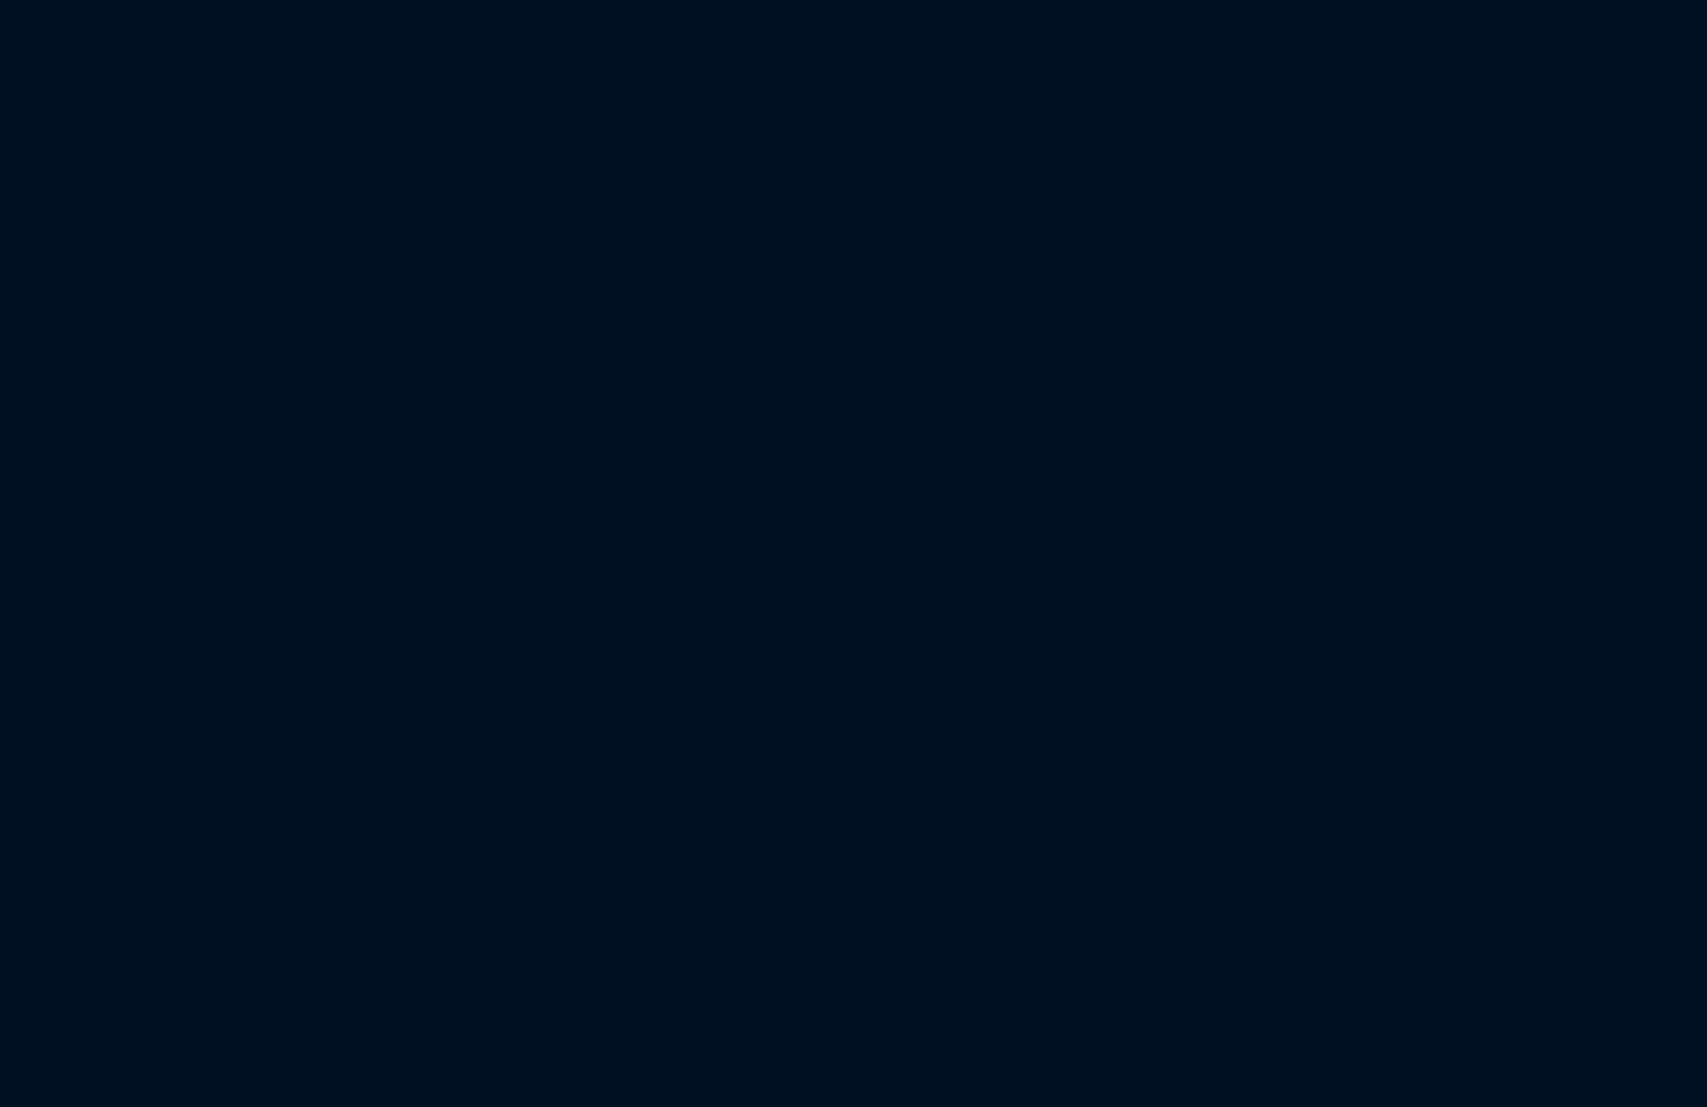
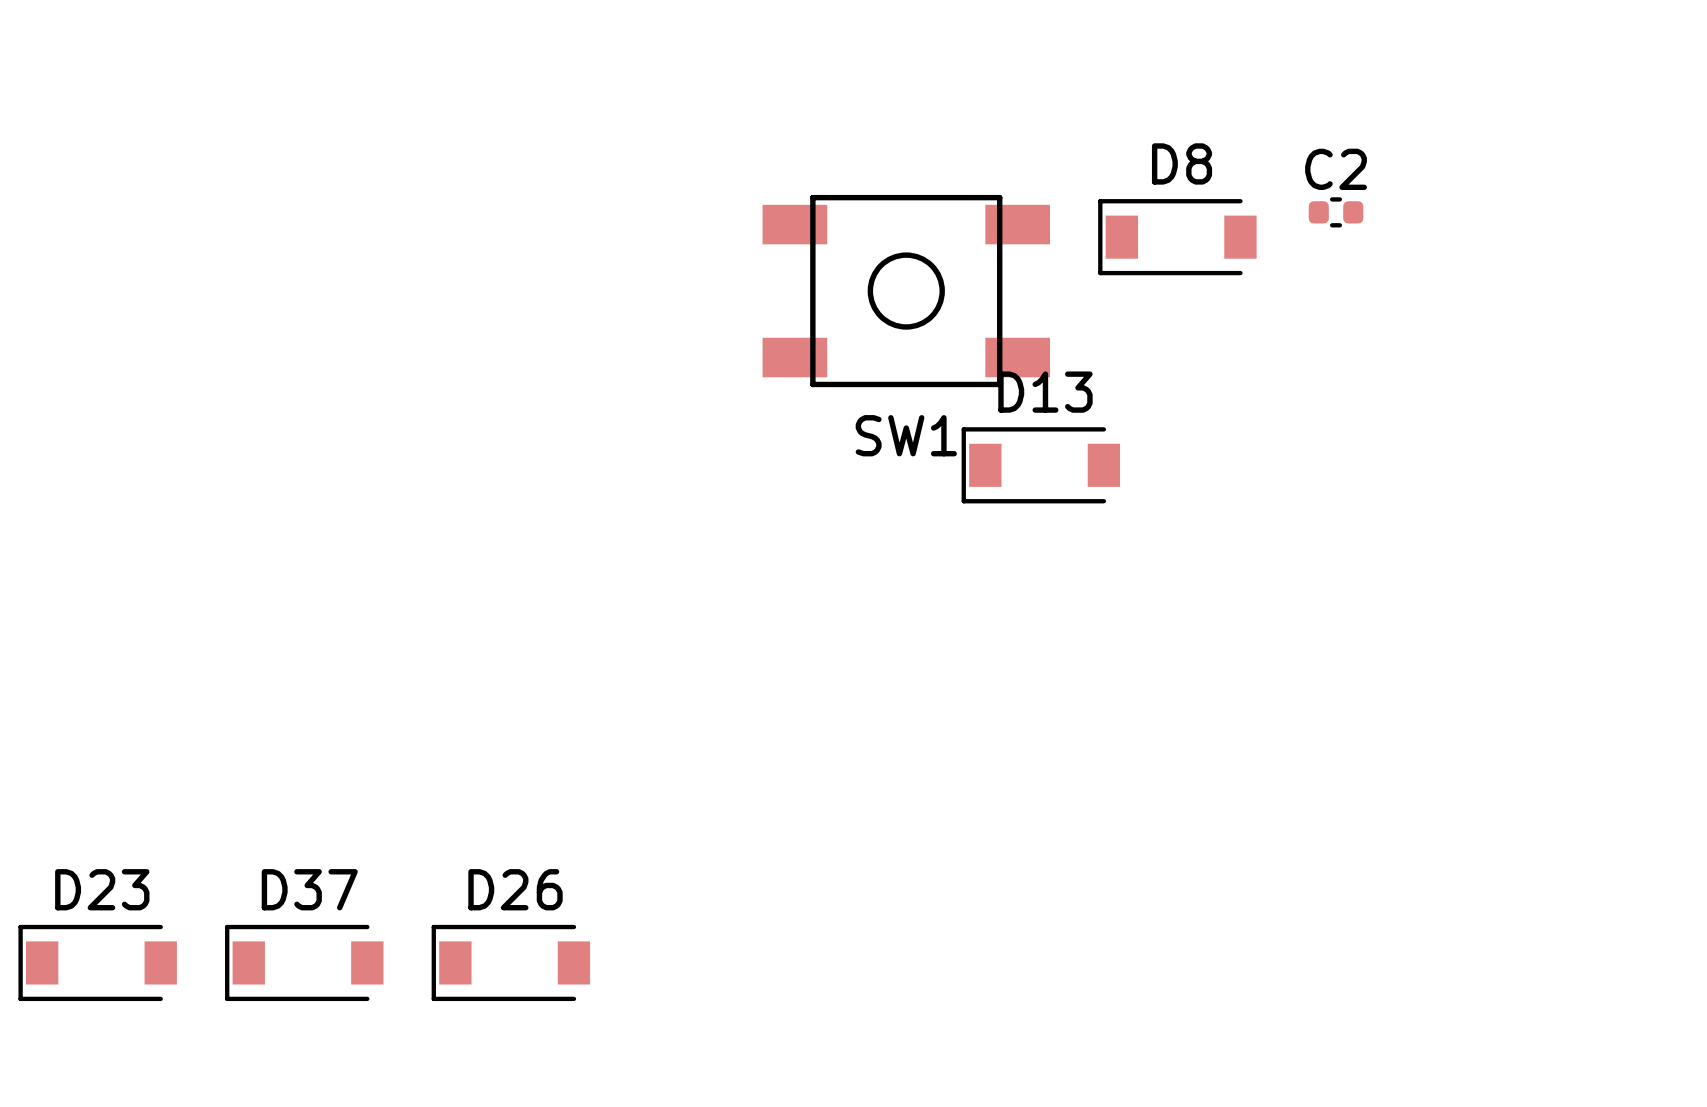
C2: none -> (1336, 212)
D8: none -> (1177, 237)
SW1: none -> (906, 291)
D13: none -> (1040, 465)
D23: none -> (97, 962)
D37: none -> (304, 962)
D26: none -> (510, 962)

